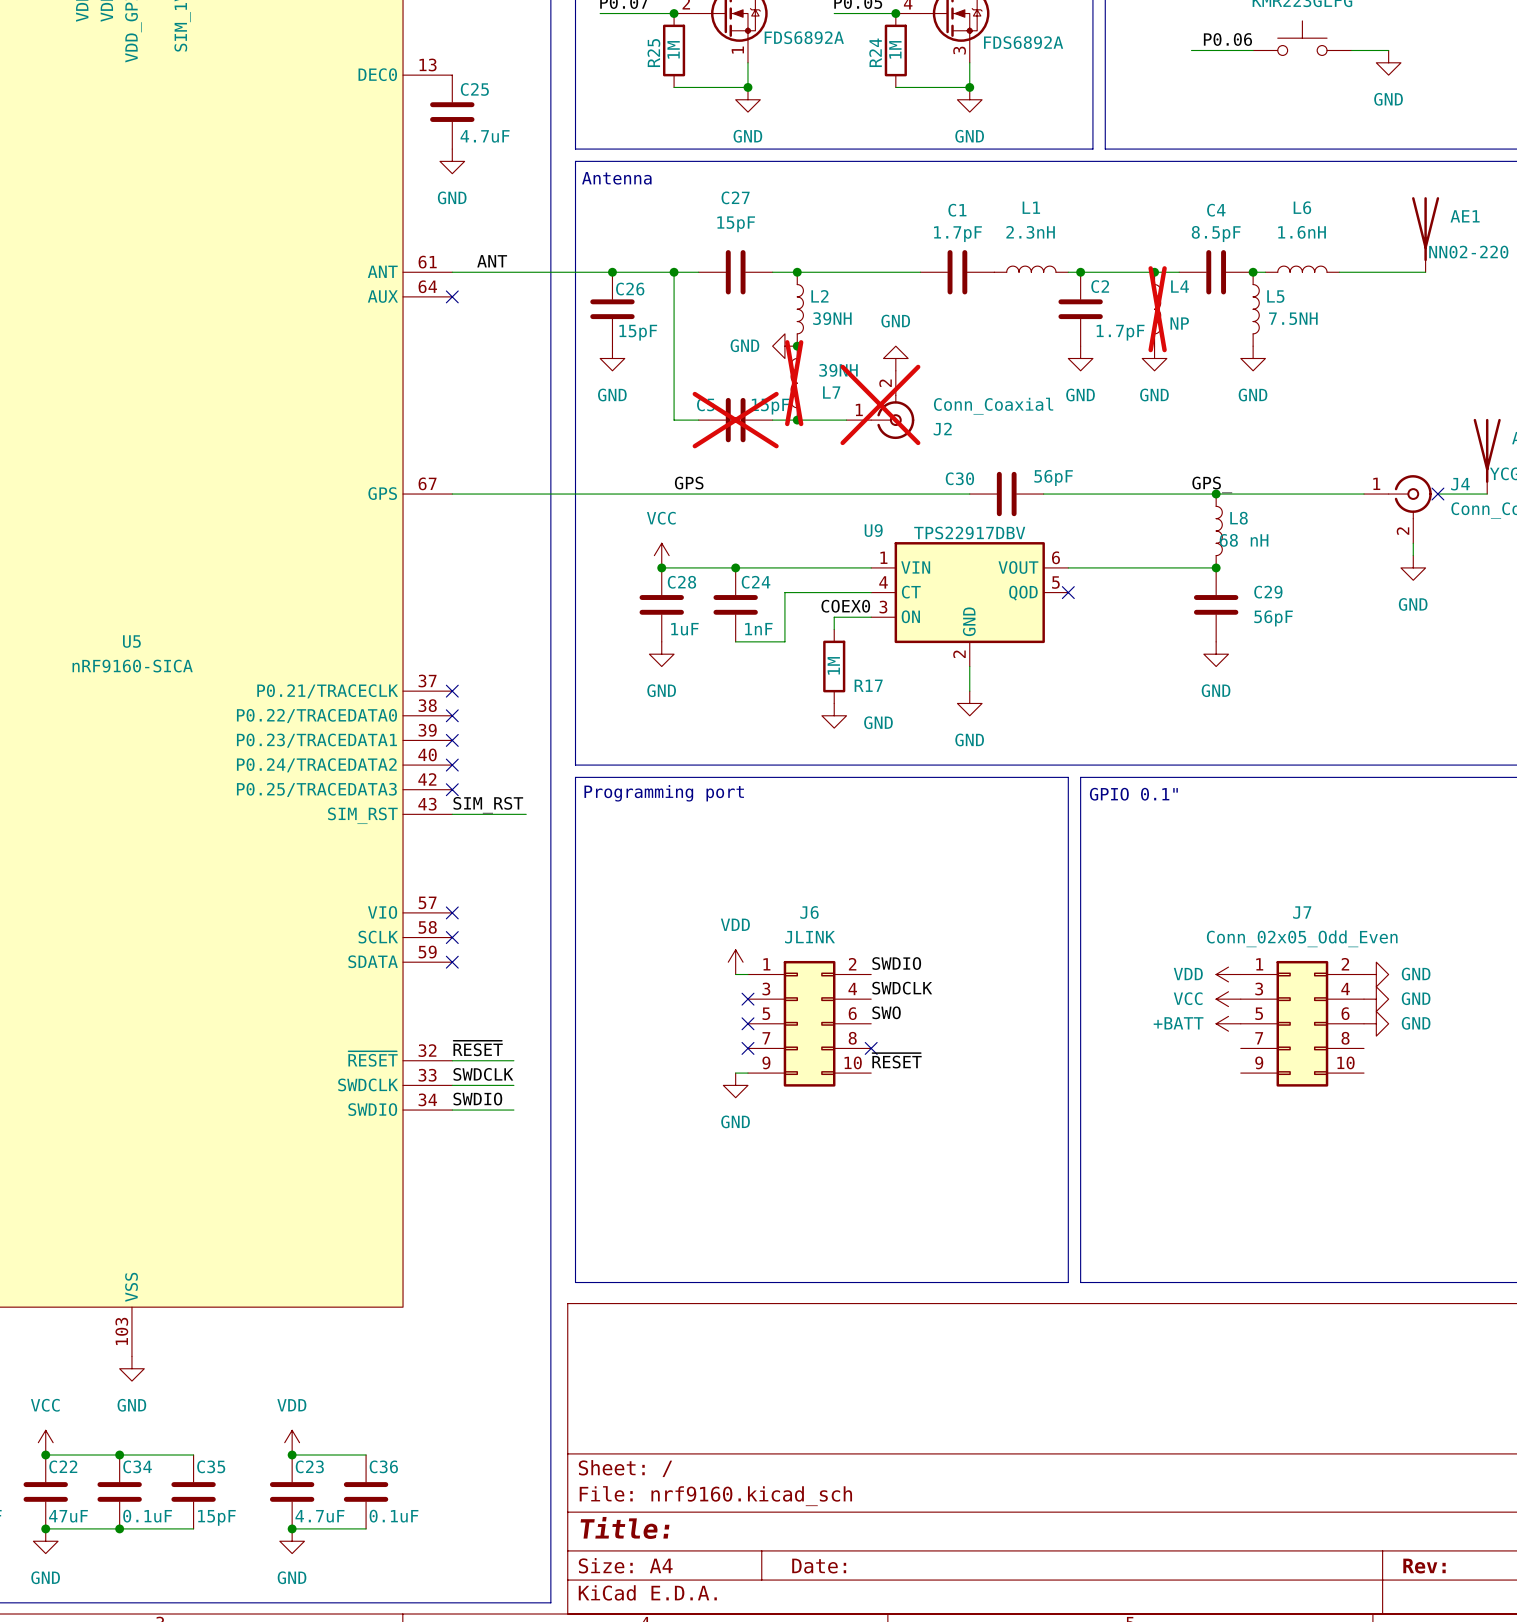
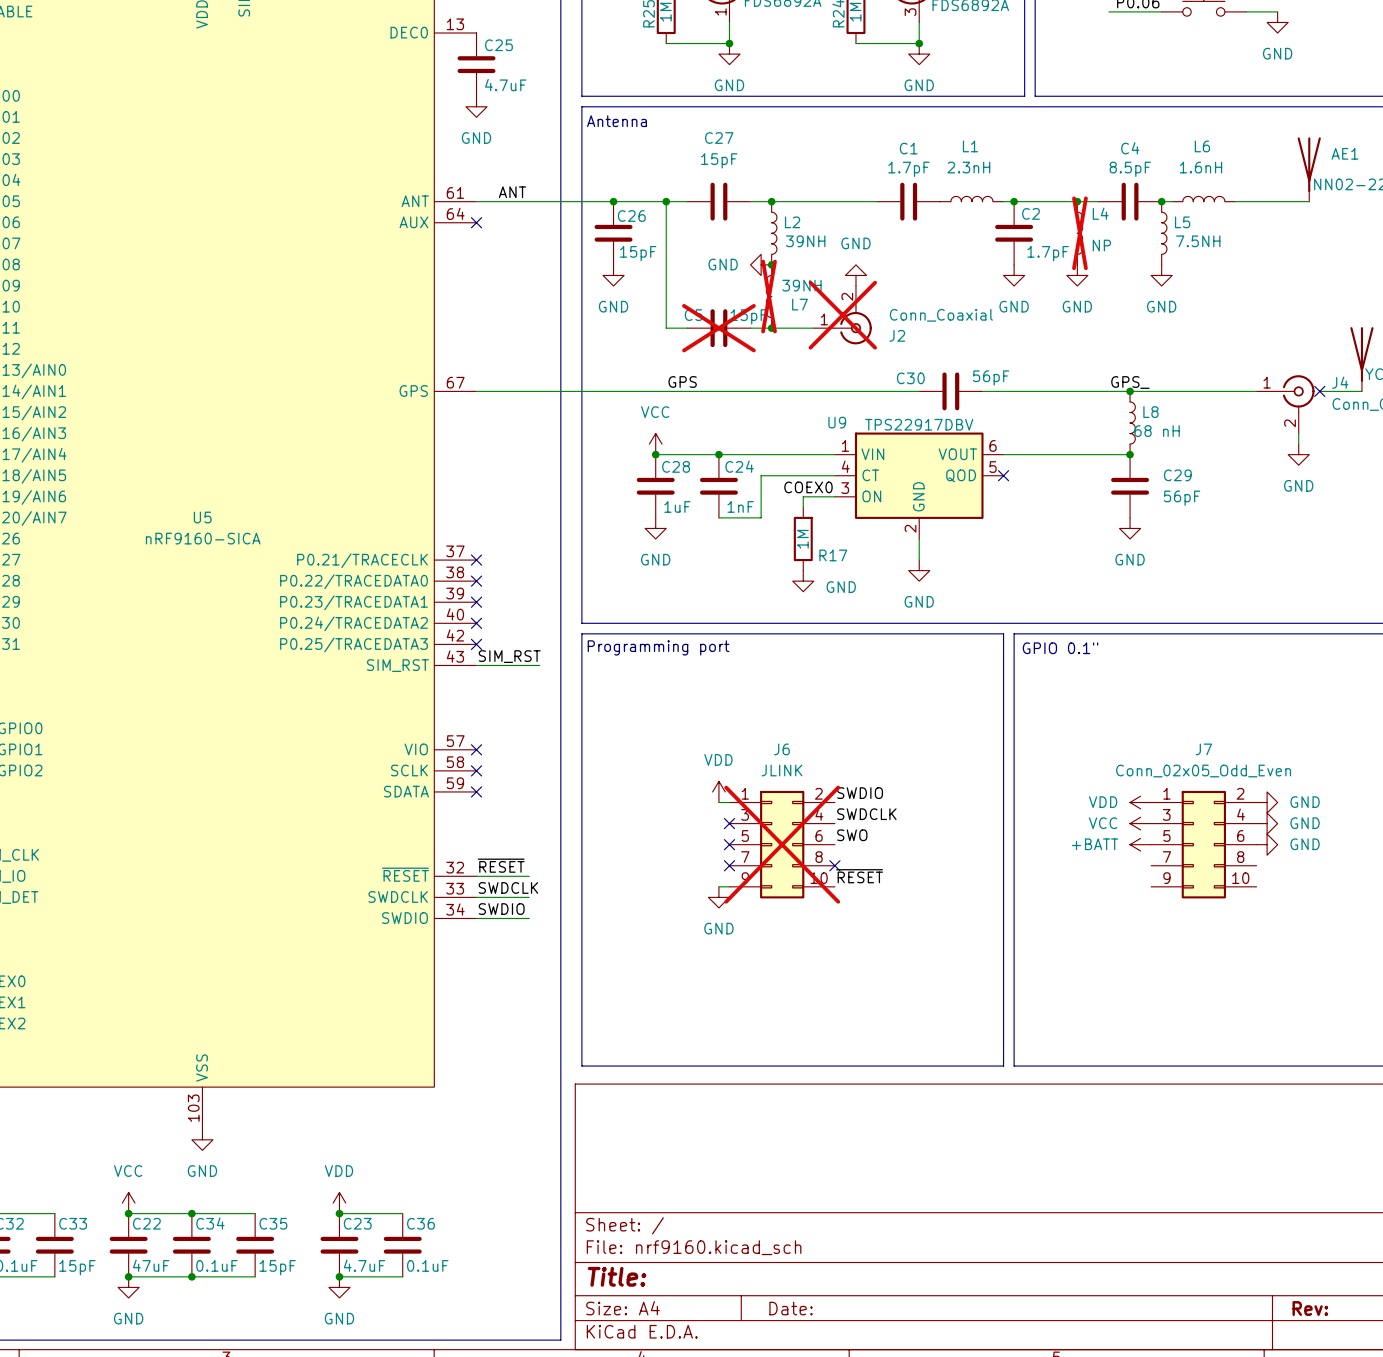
J6 do-not-place cross: none -> (782, 844)

